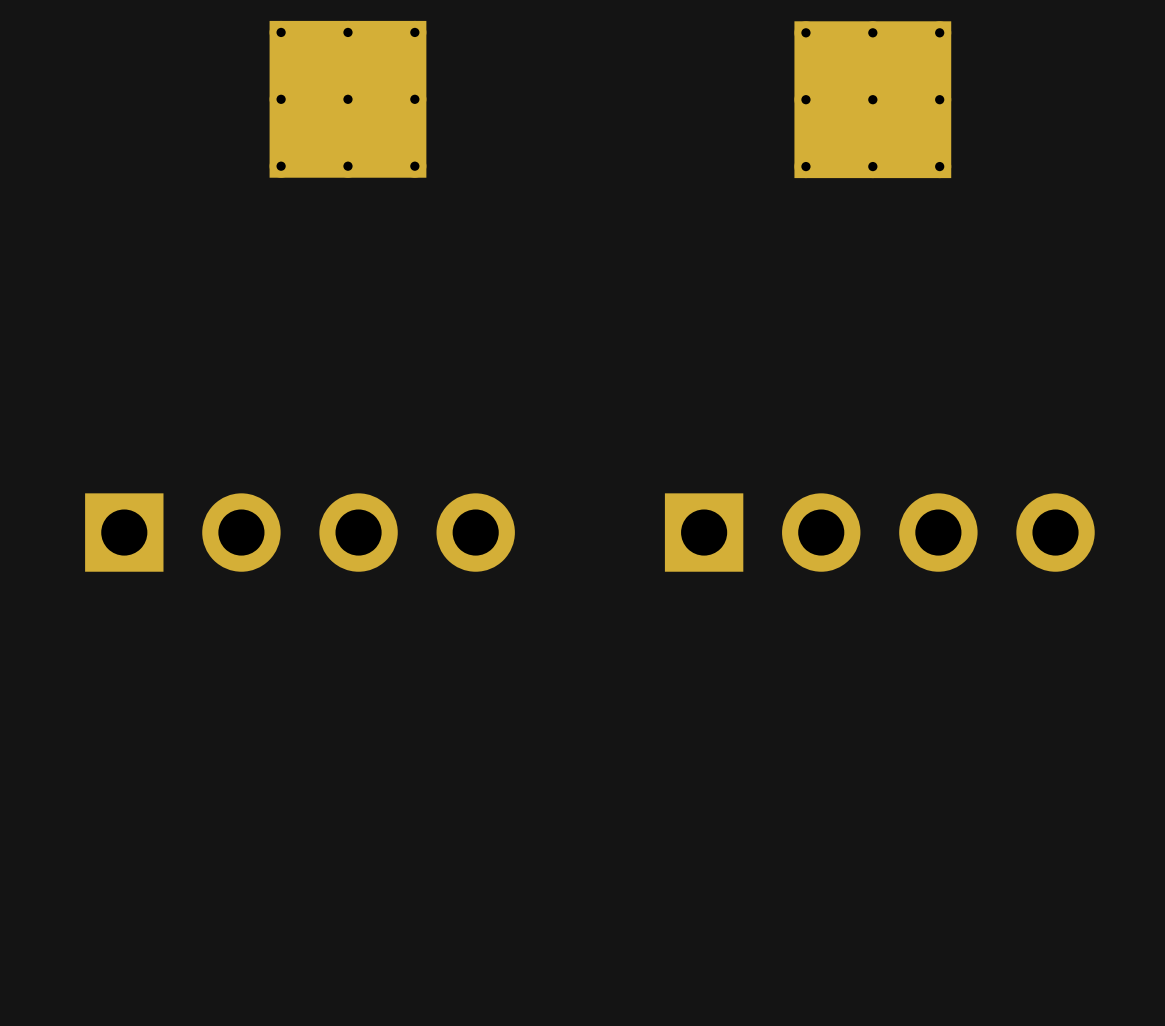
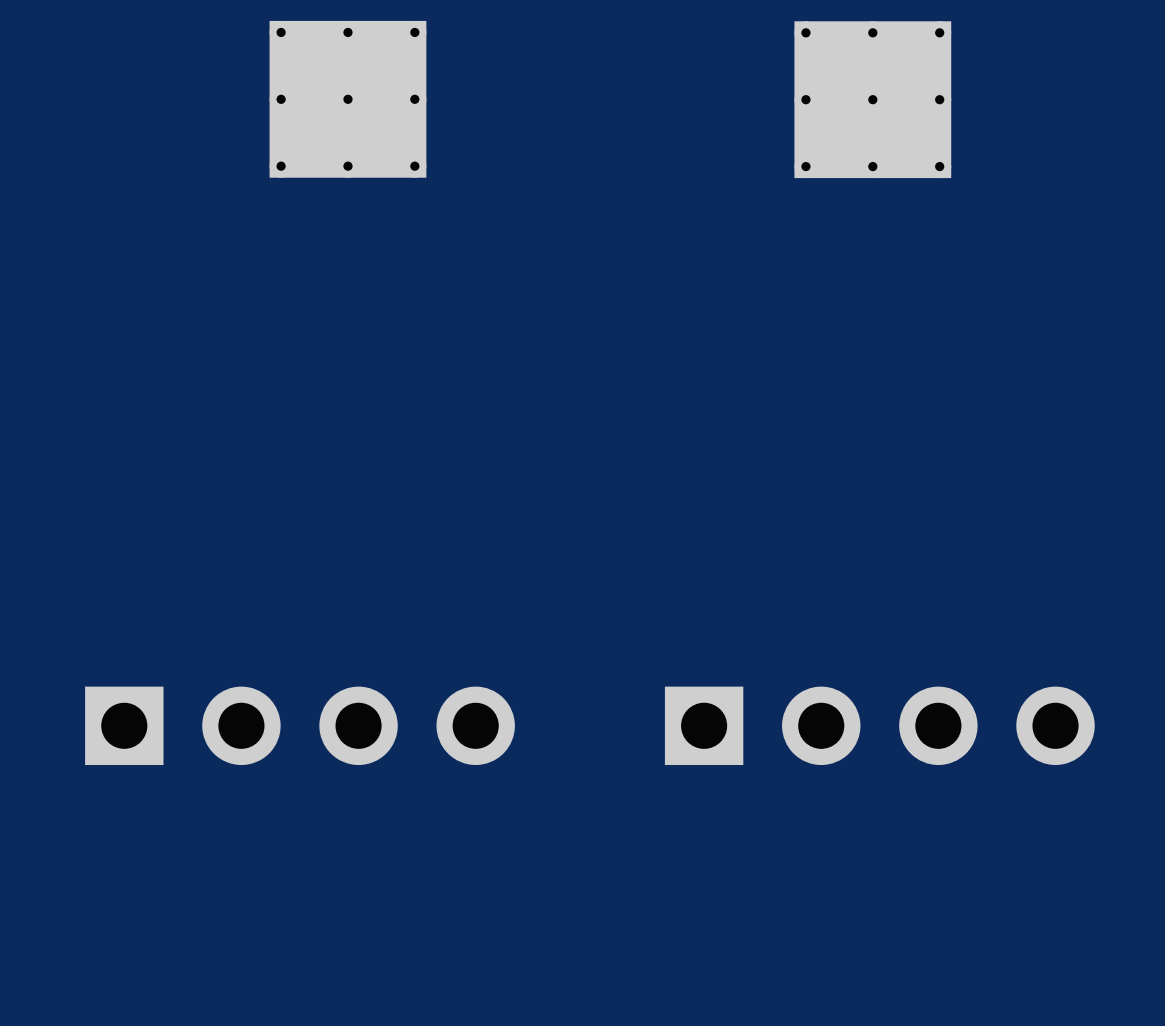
part position: (299, 532) -> (299, 725)
part position: (879, 532) -> (879, 725)

